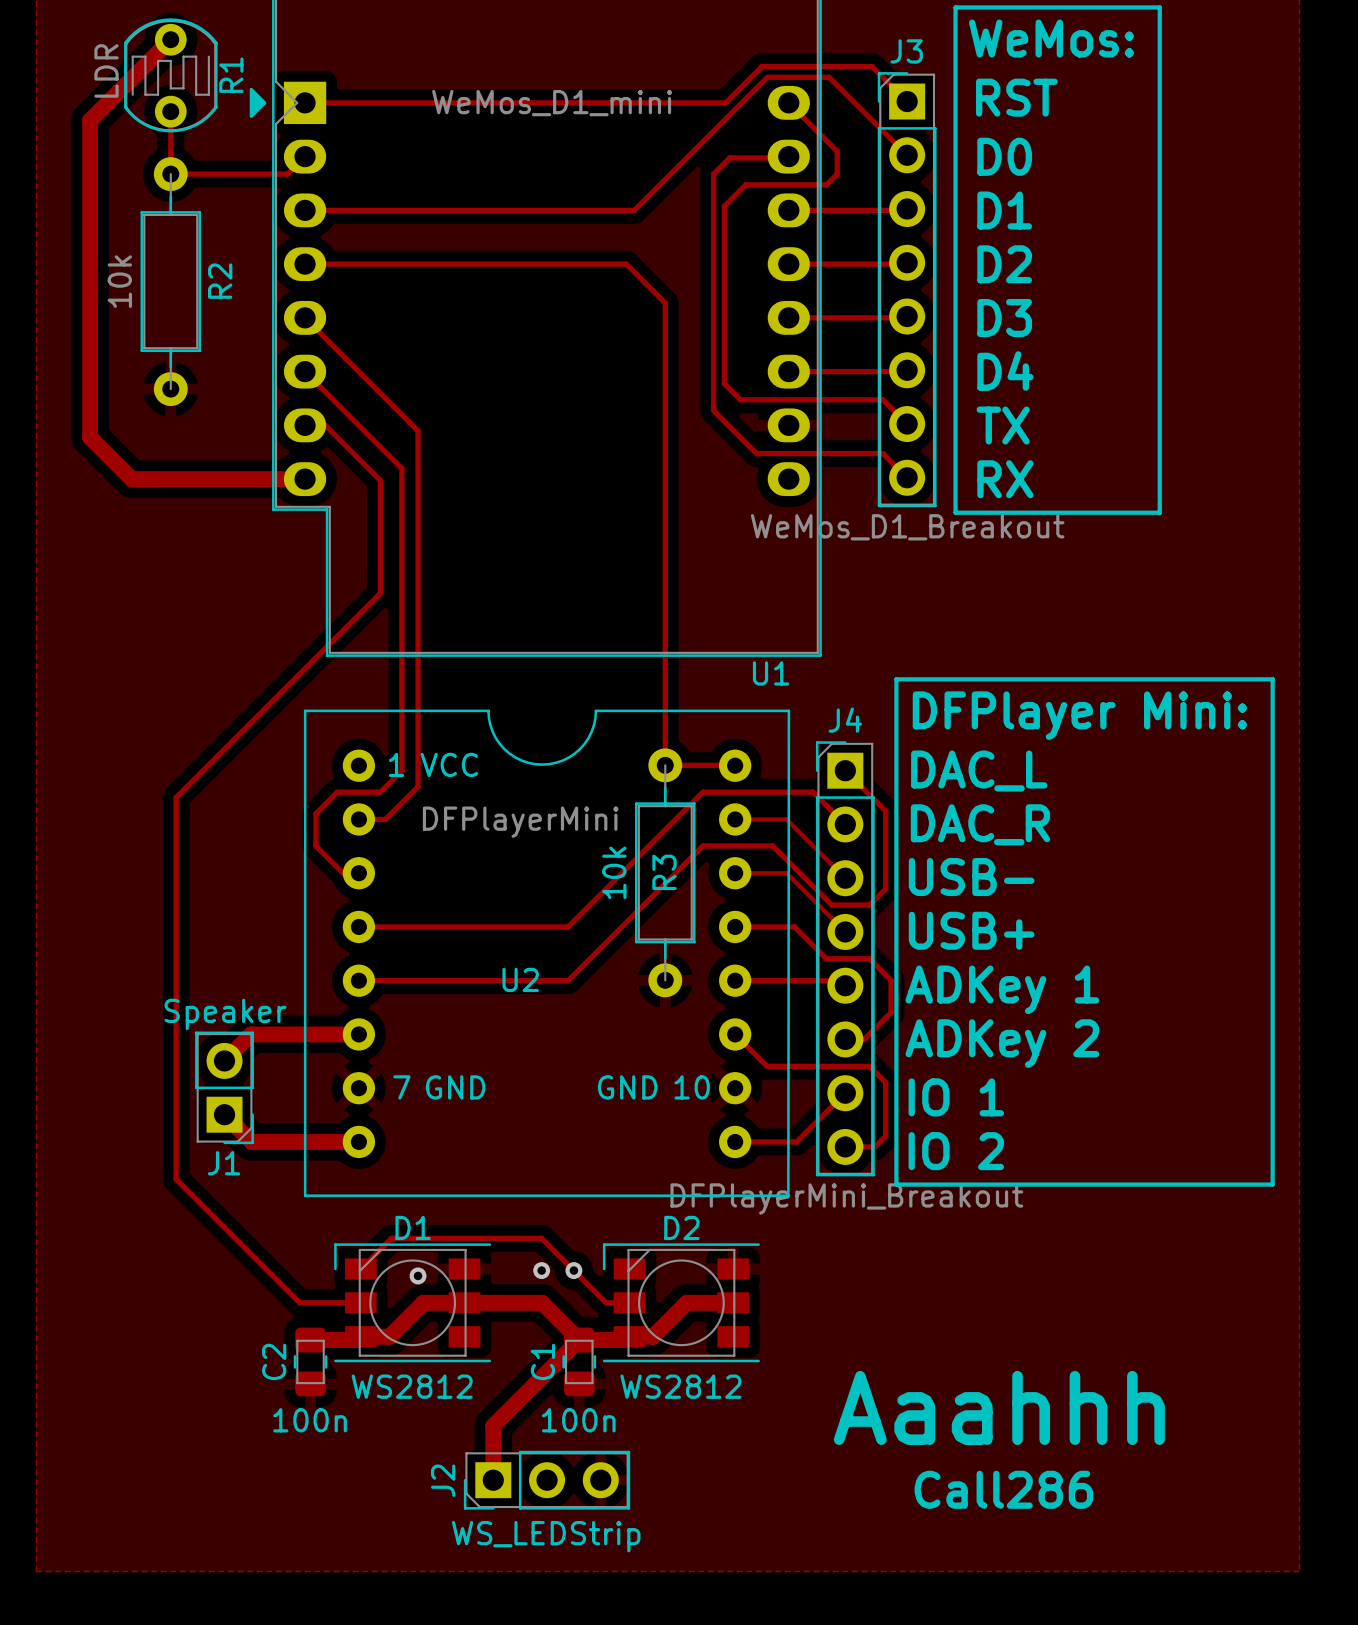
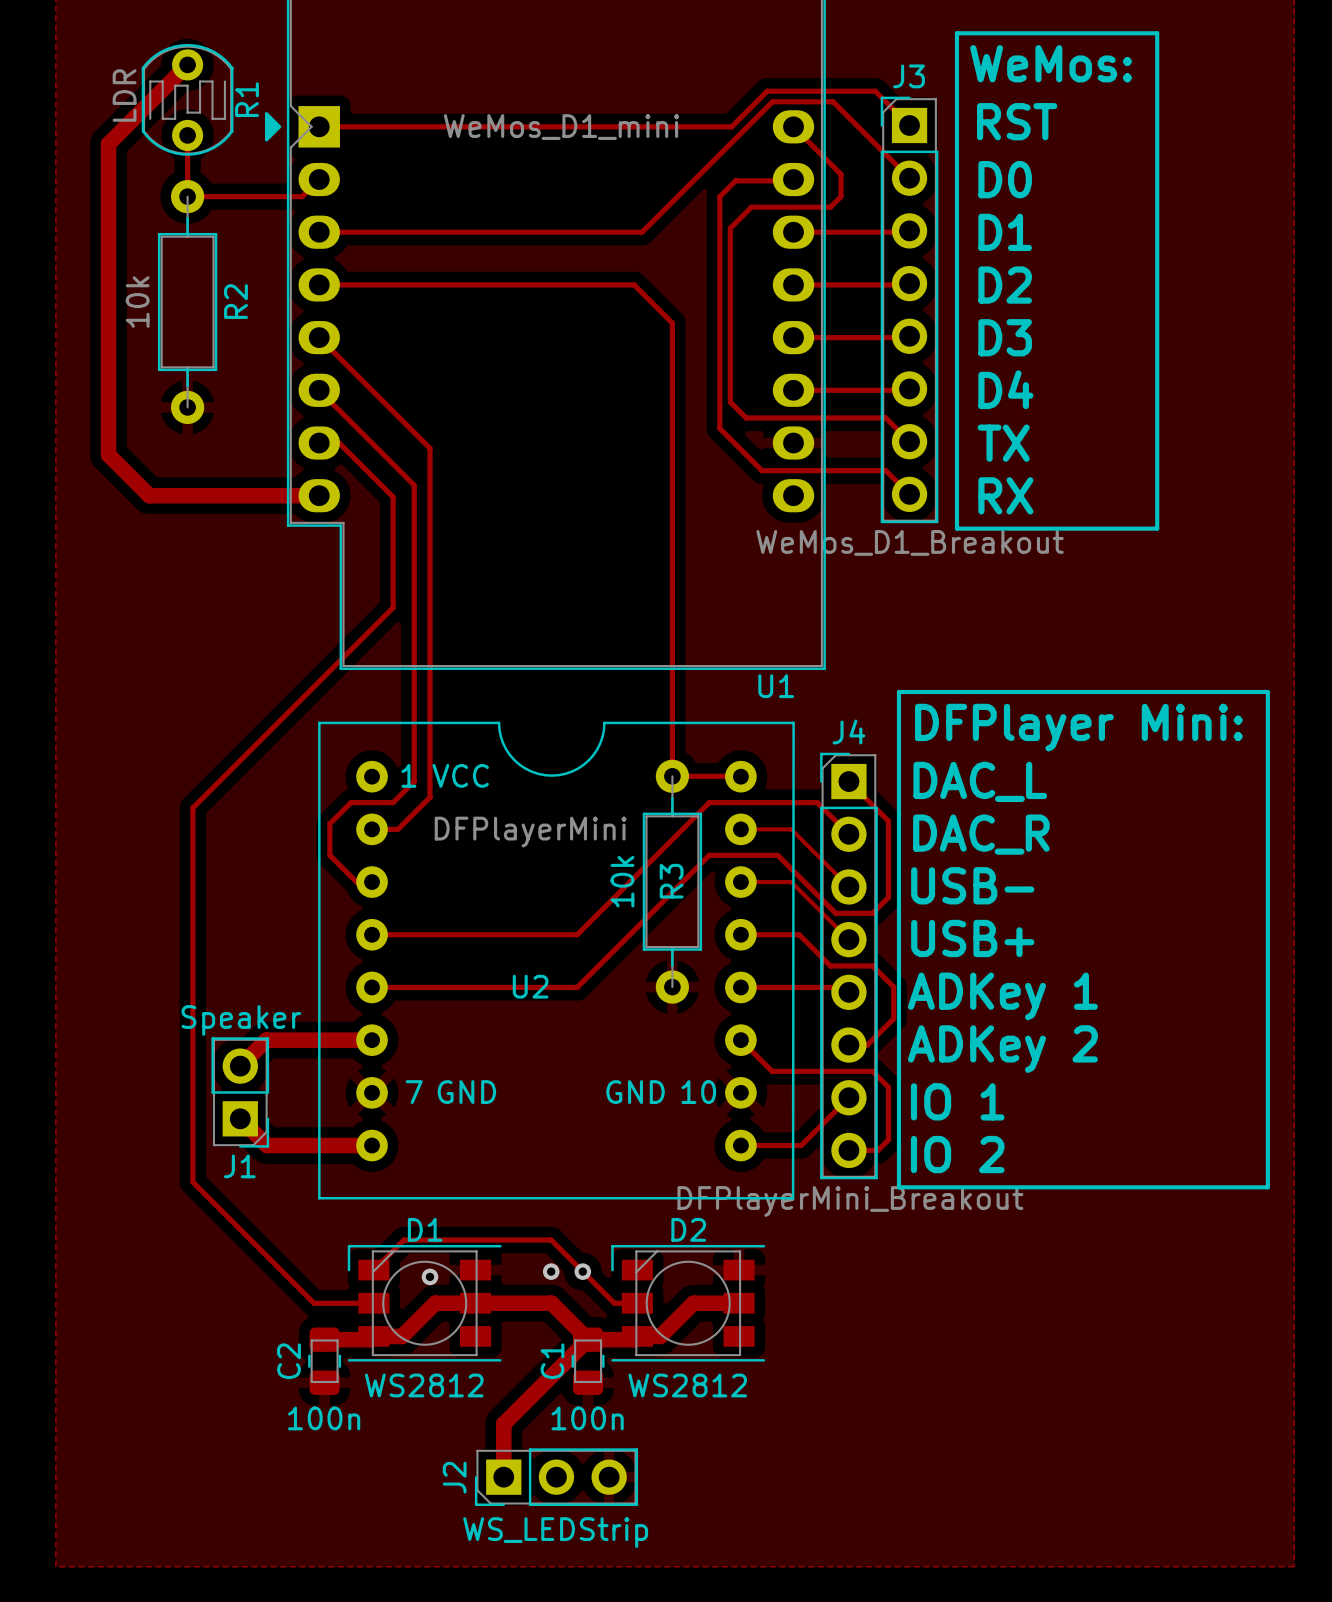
text: Aaahhh (999, 1407) -> none
text: Call286 (1003, 1489) -> none

